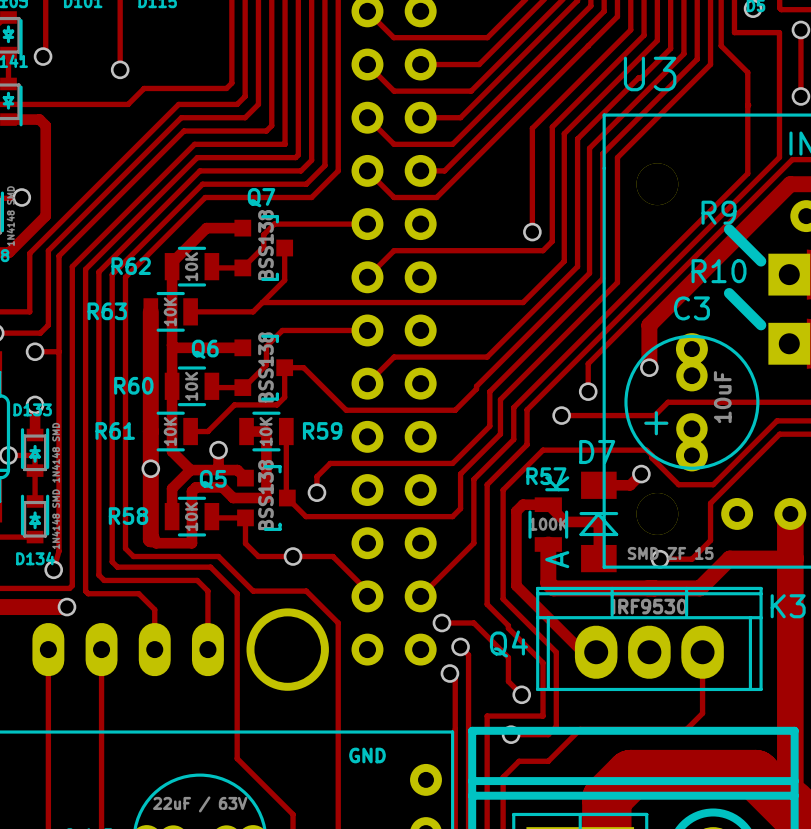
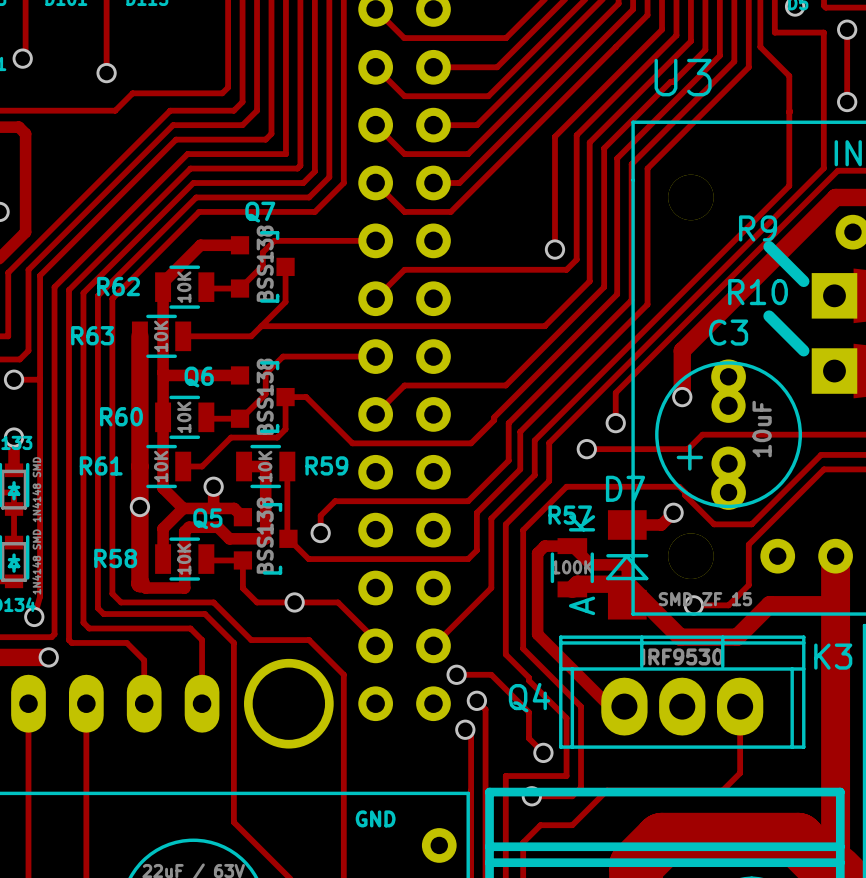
track: (548, 544) (548, 583) (553, 588) (647, 588) -> (572, 589) (577, 584) (627, 584) (680, 637)

